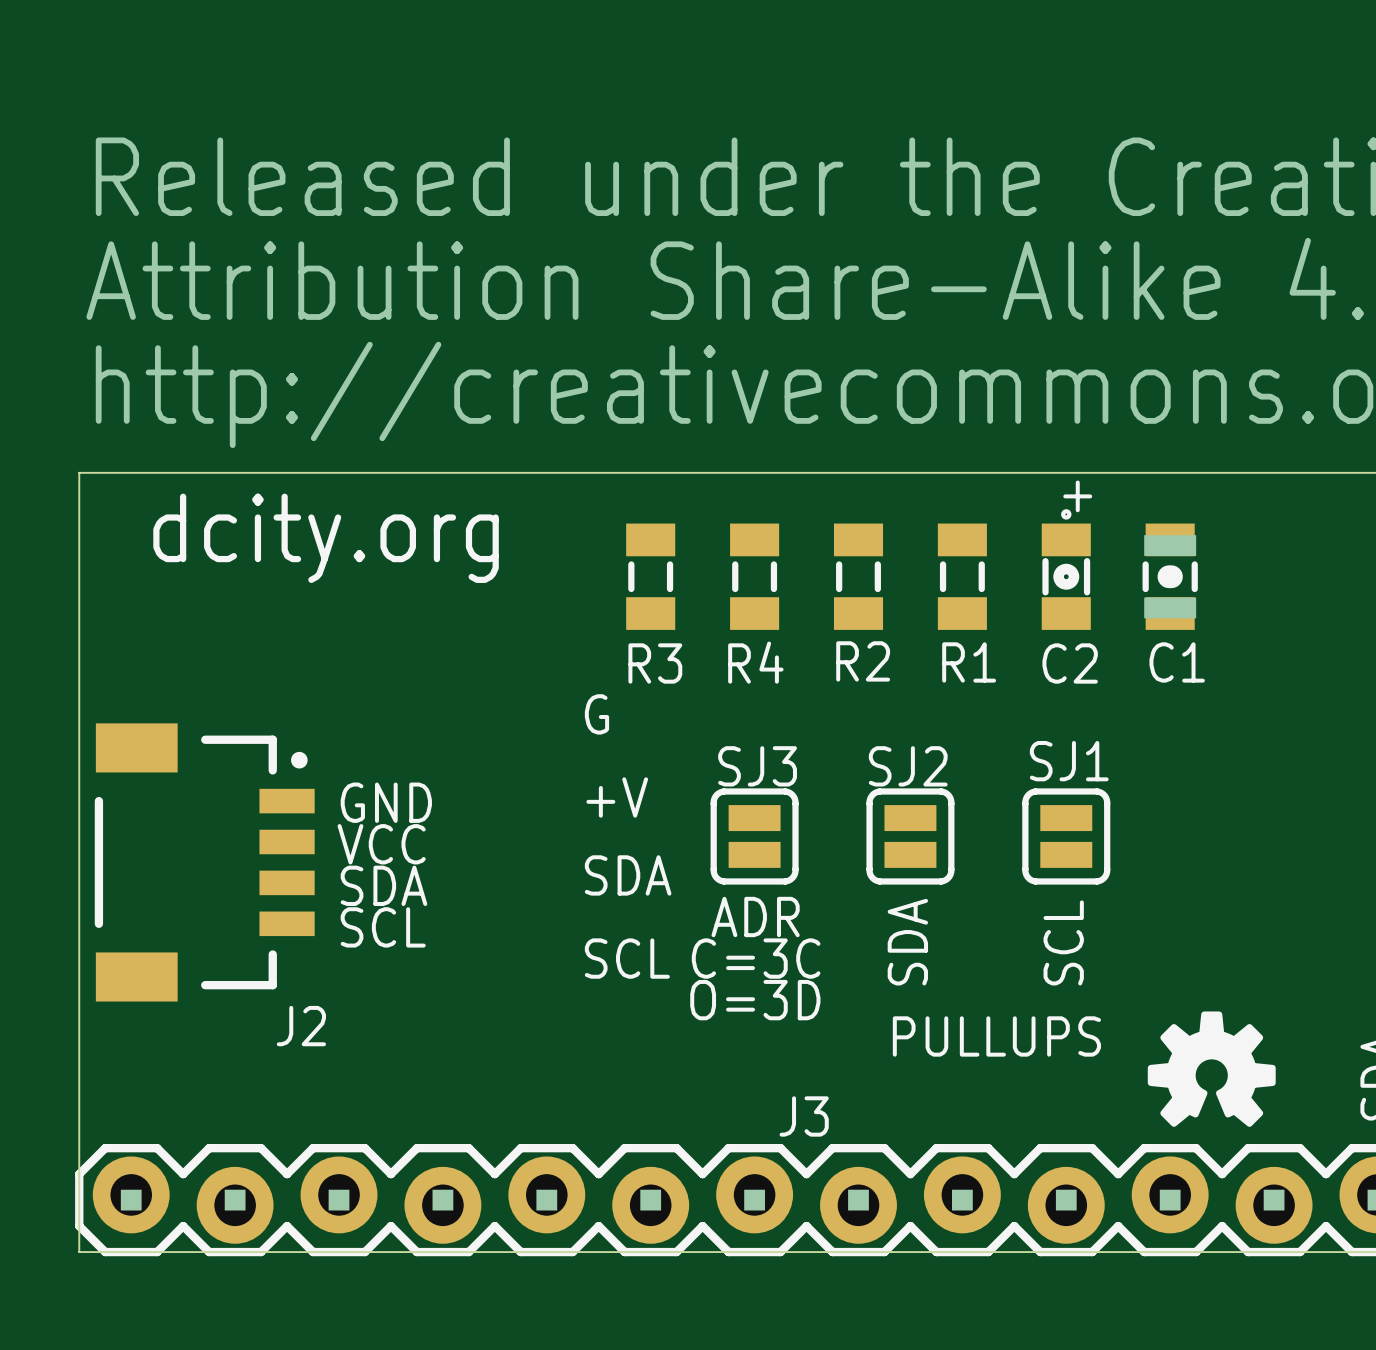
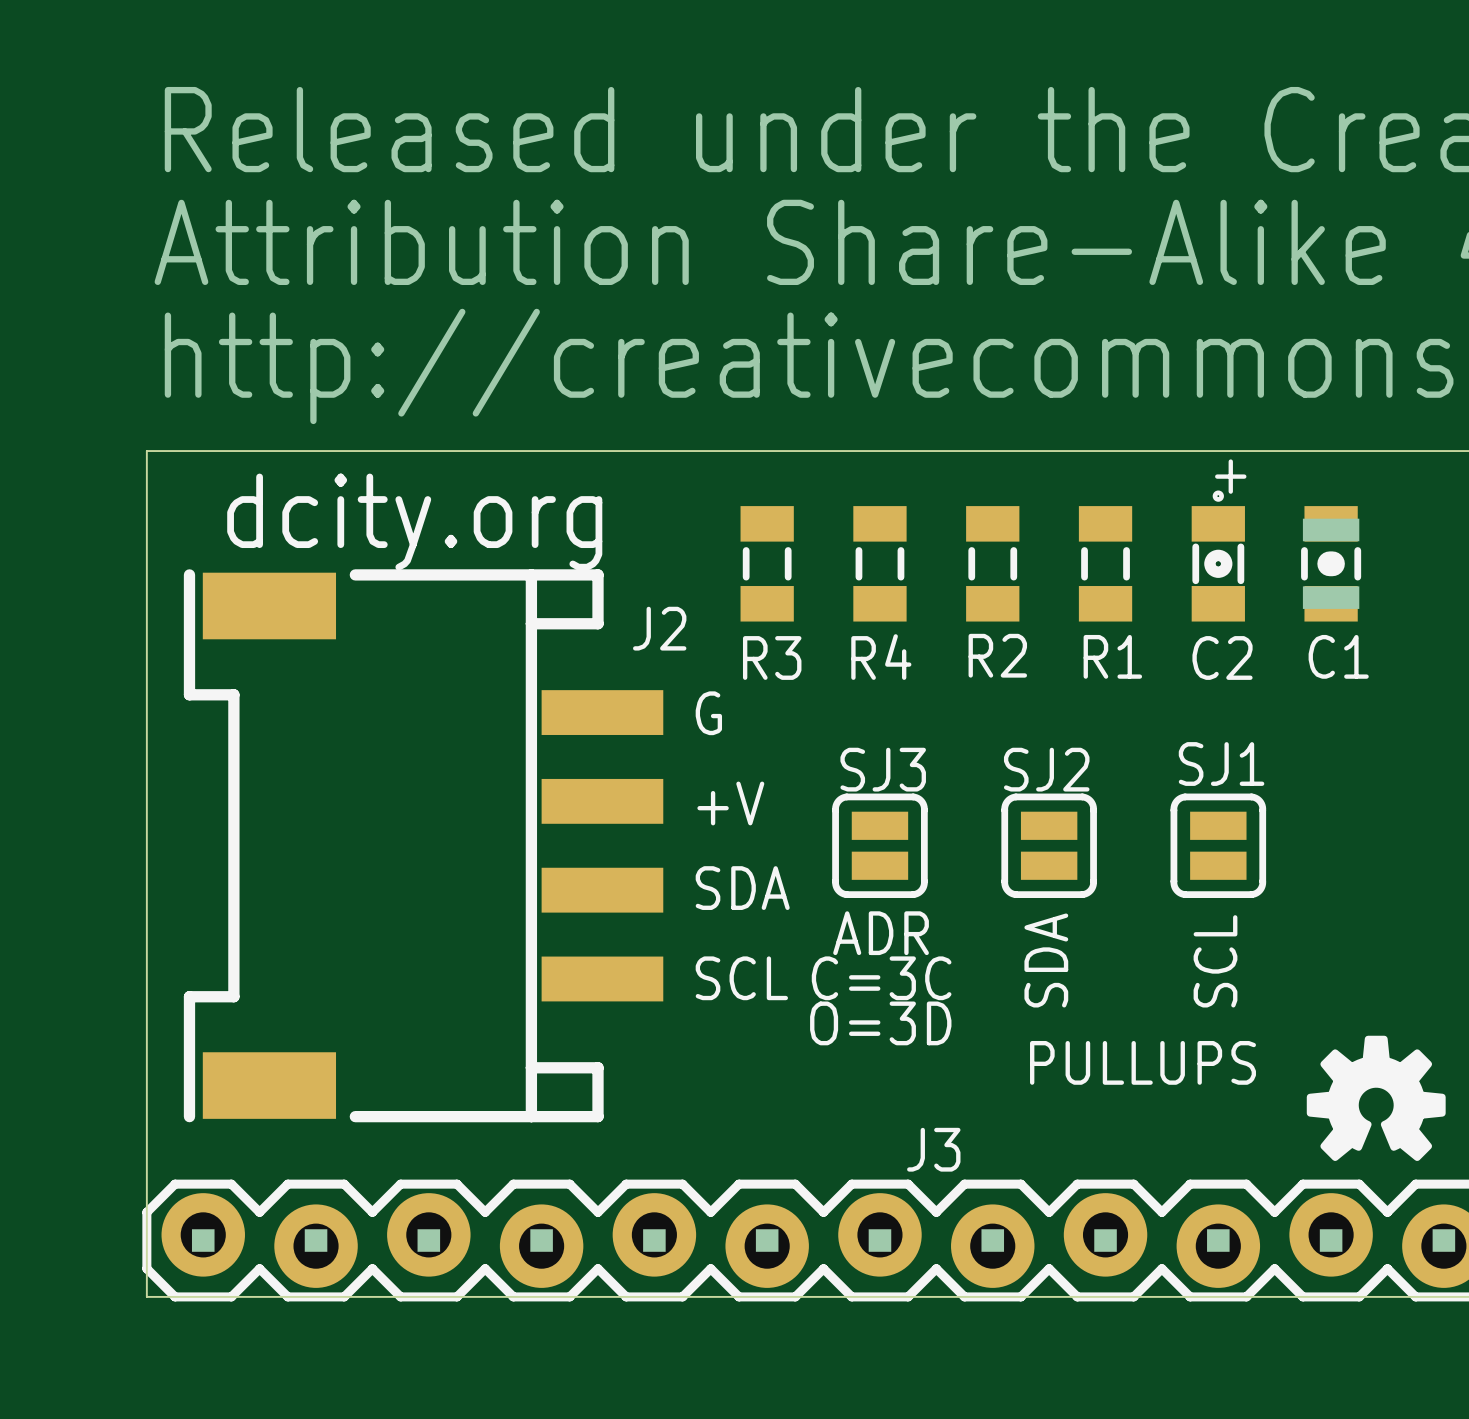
J2 footprint: [94, 723, 315, 1002] -> [183, 569, 664, 1123]
text: GND (386, 802) -> none
text: VCC (381, 844) -> none
text: SDA (383, 885) -> none
text: SCL (383, 927) -> none
J2 name position: J2 (301, 1026) -> J2 (659, 628)

